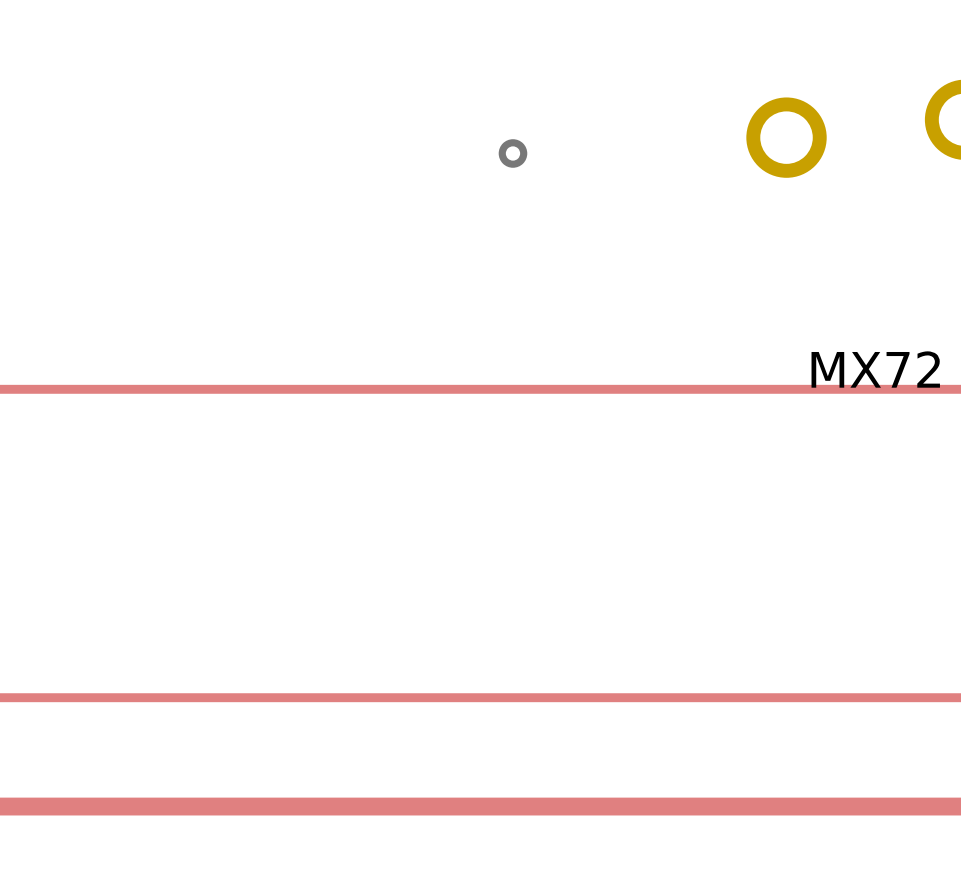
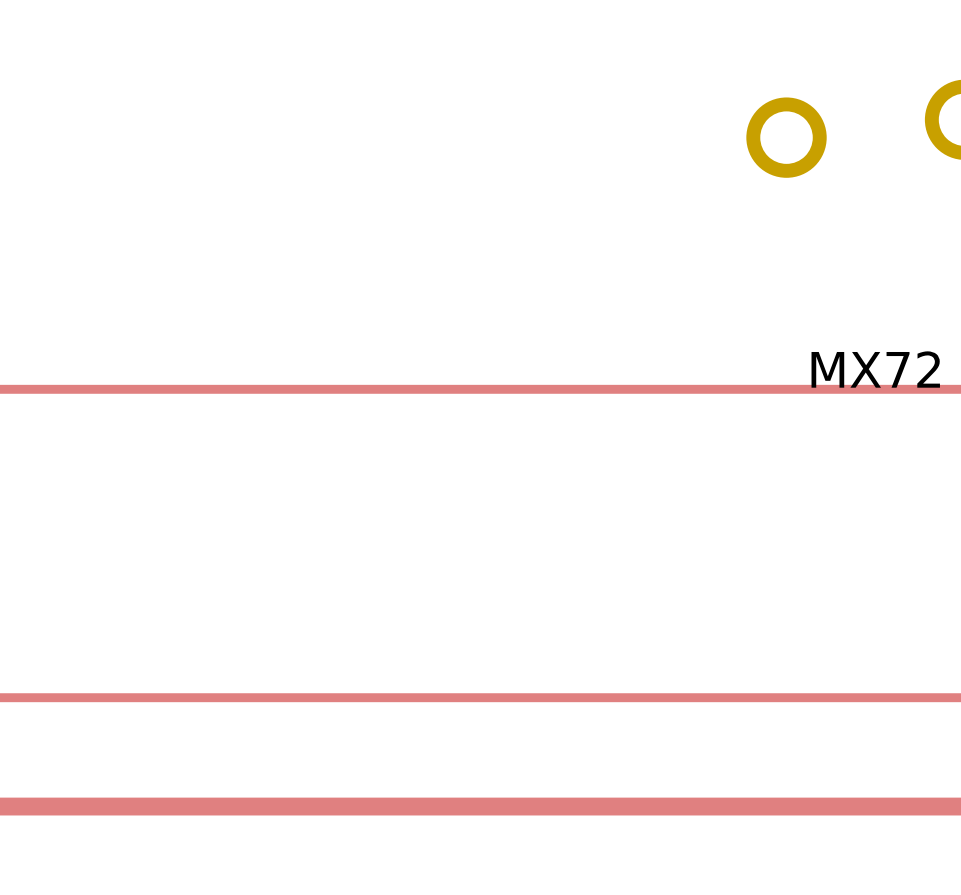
via: (512, 153) -> none

